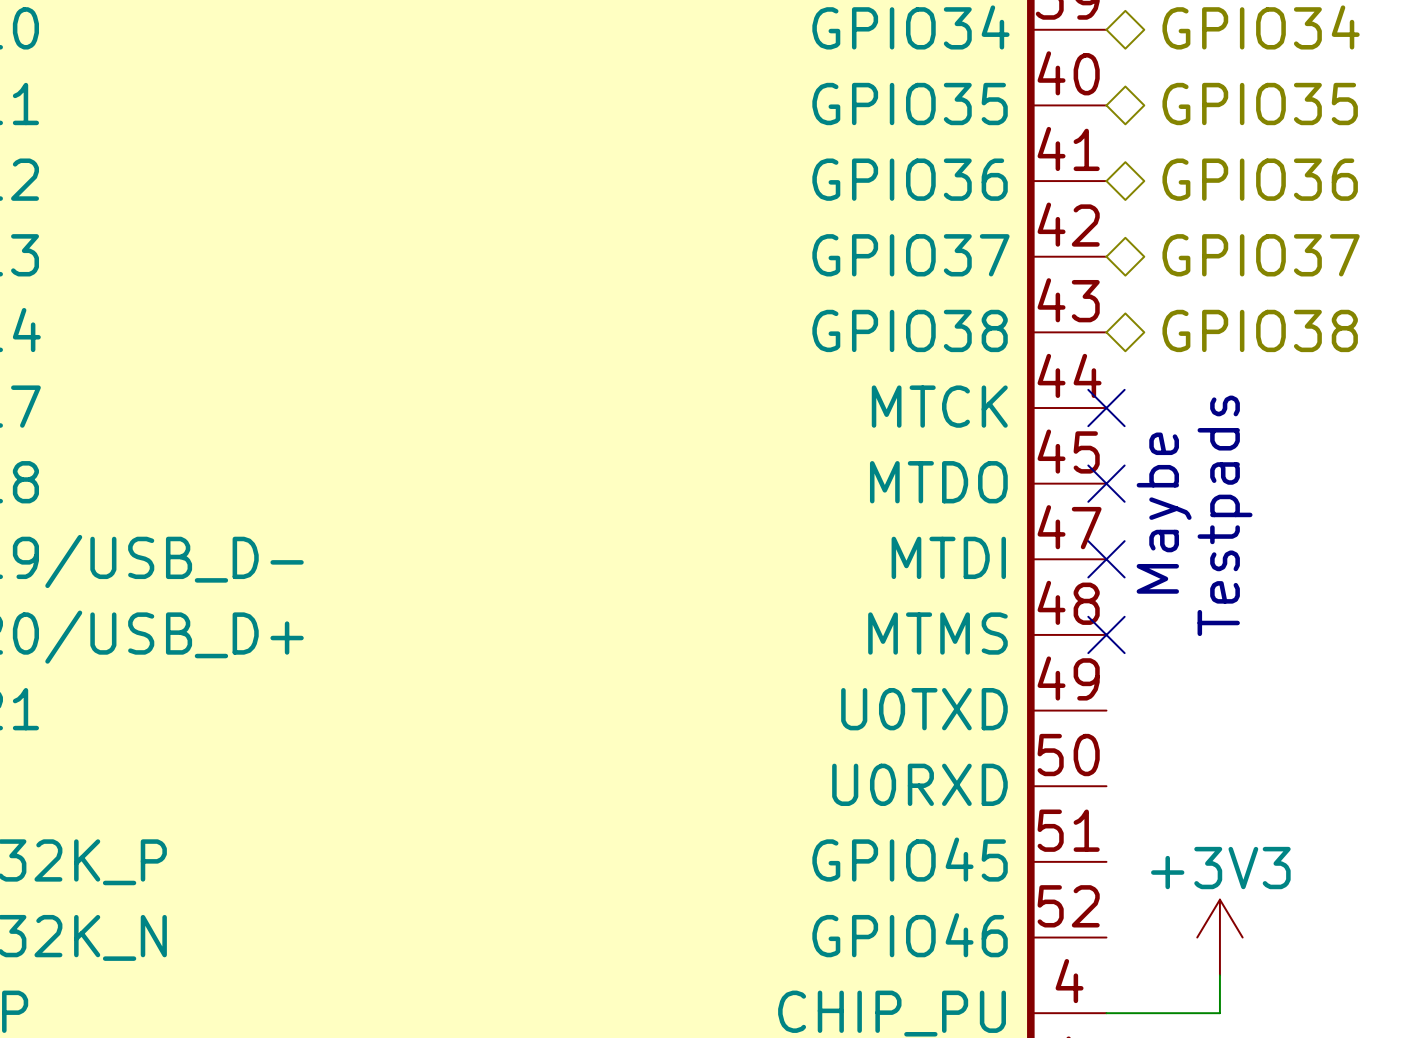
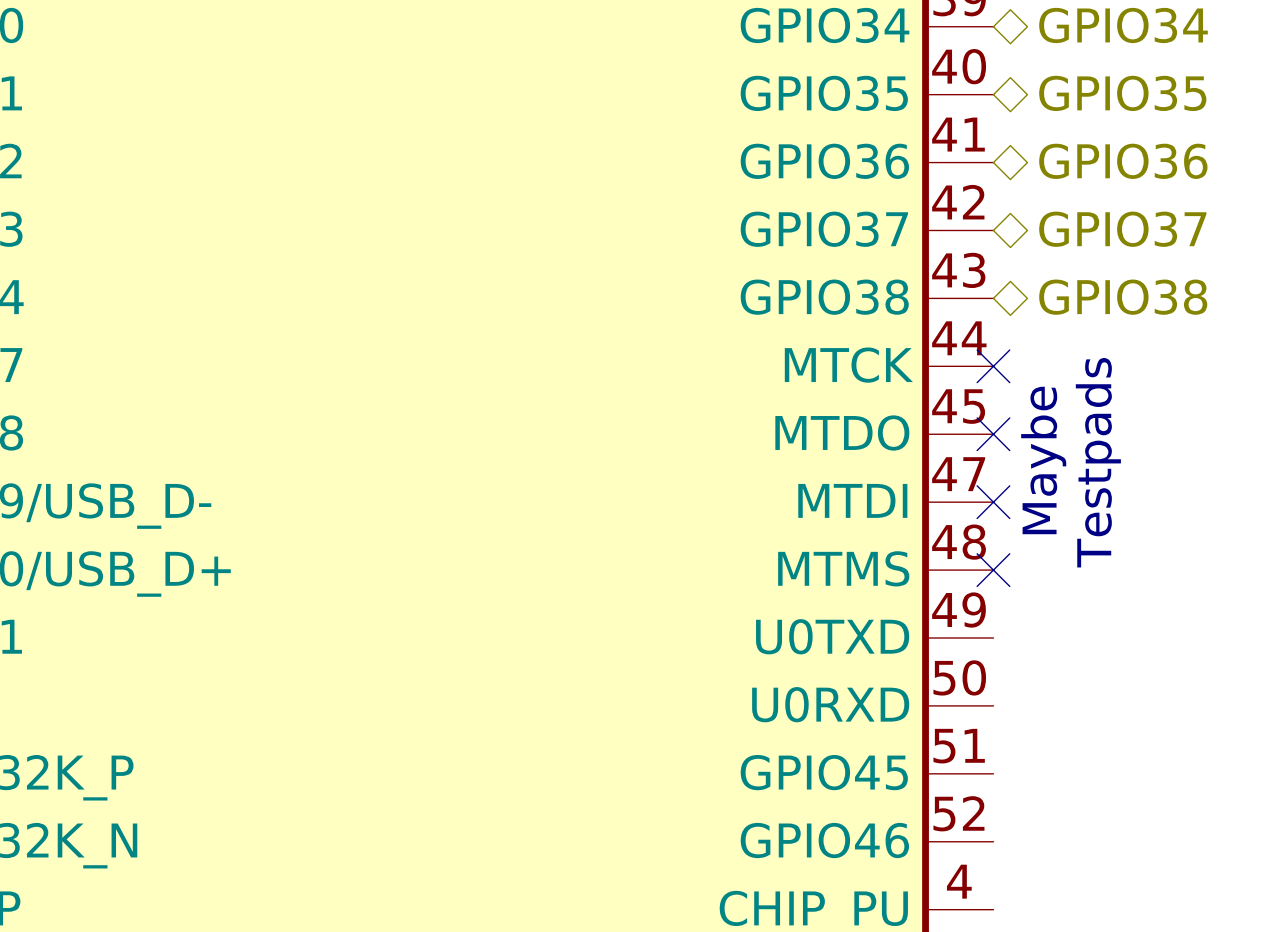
power symbol: +3V3 (1219, 937) -> none
wire: (1219, 975) (1219, 1013) (1106, 1013) -> none

